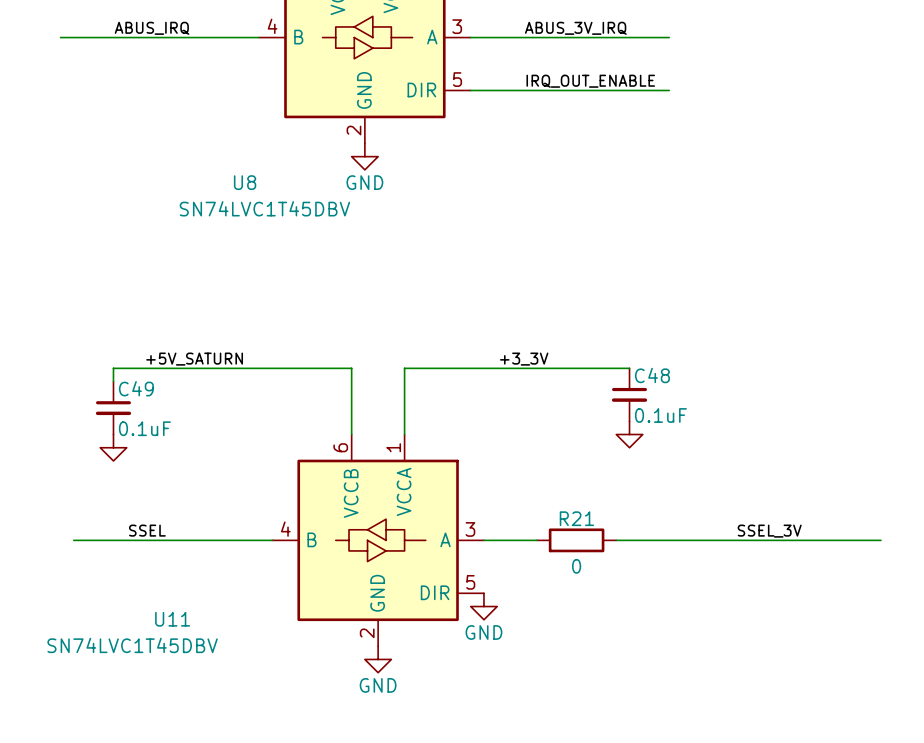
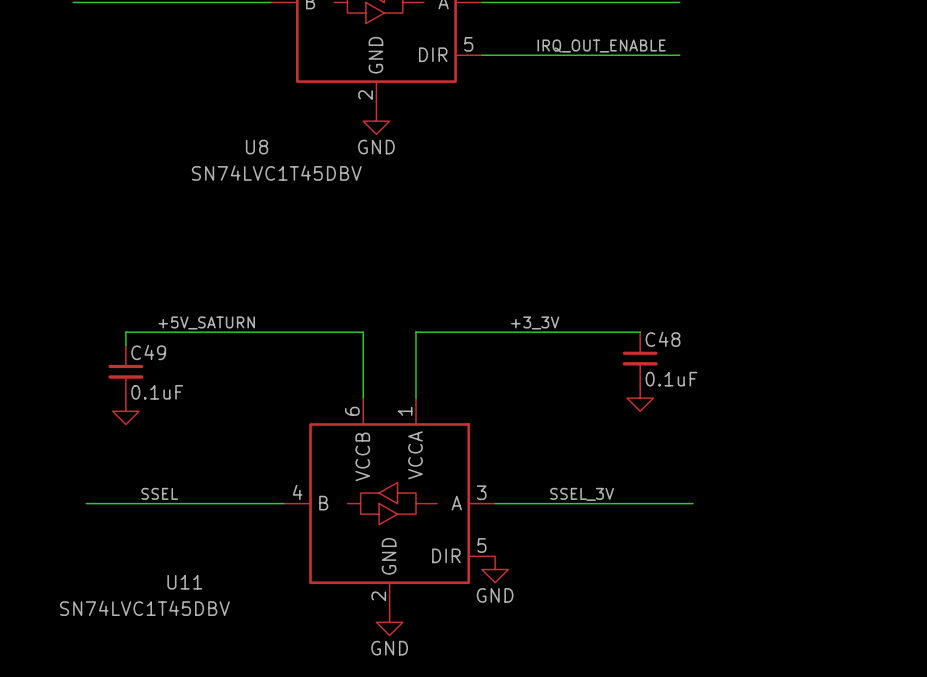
label position: SSEL_3V (769, 531) -> SSEL_3V (582, 494)
wire: none -> (547, 503) (627, 503)
R21: 0 (576, 540) -> none
wire: (682, 540) (880, 540) -> none

